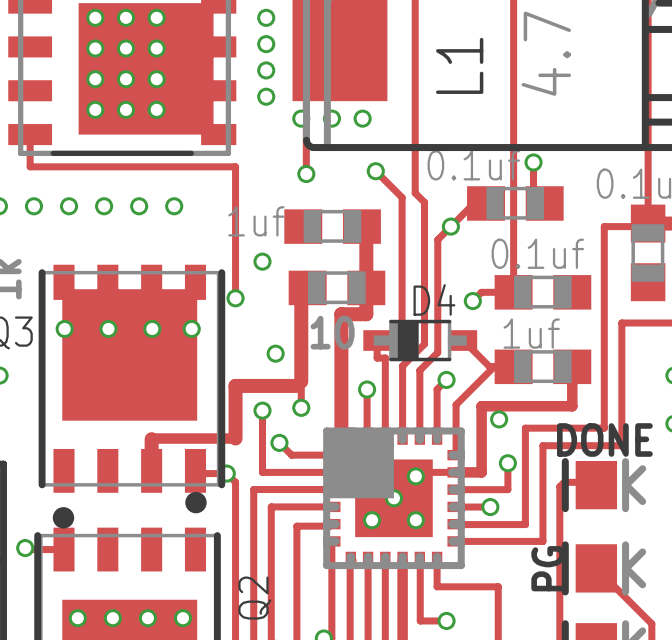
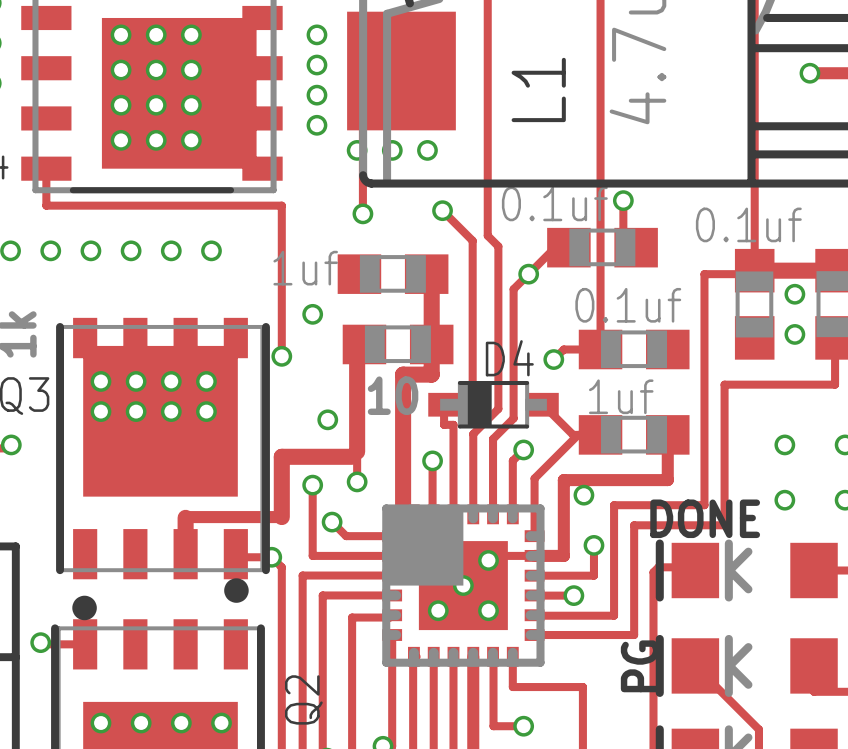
via: none -> (100, 381)
via: none -> (136, 381)
via: none -> (171, 381)
via: none -> (206, 381)
via: (64, 328) -> none
via: (108, 328) -> none
via: (152, 328) -> none
via: (191, 328) -> none
via: none -> (100, 411)
via: none -> (136, 411)
via: none -> (171, 411)
via: none -> (206, 411)

